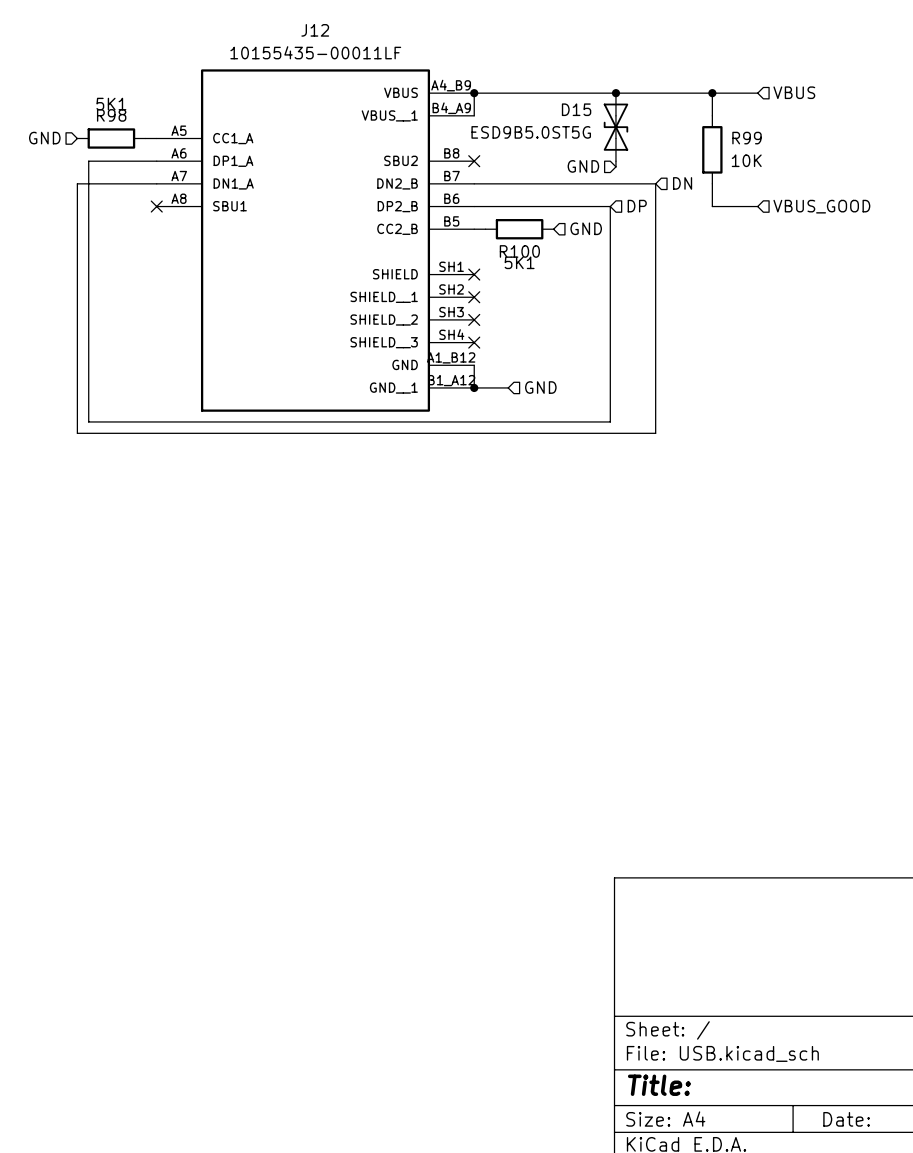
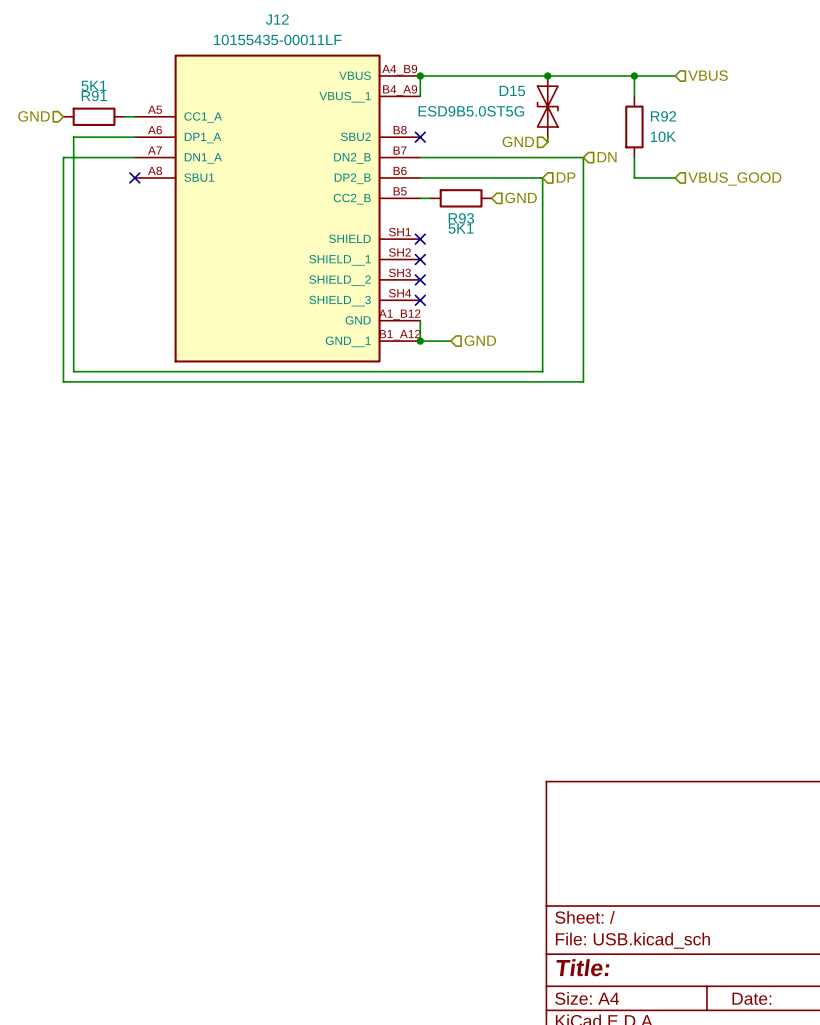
R98 name: R98 (111, 115) -> R91 (94, 96)
R99 name: R99 (747, 138) -> R92 (663, 116)
R100 name: R100 (519, 251) -> R93 (461, 218)

